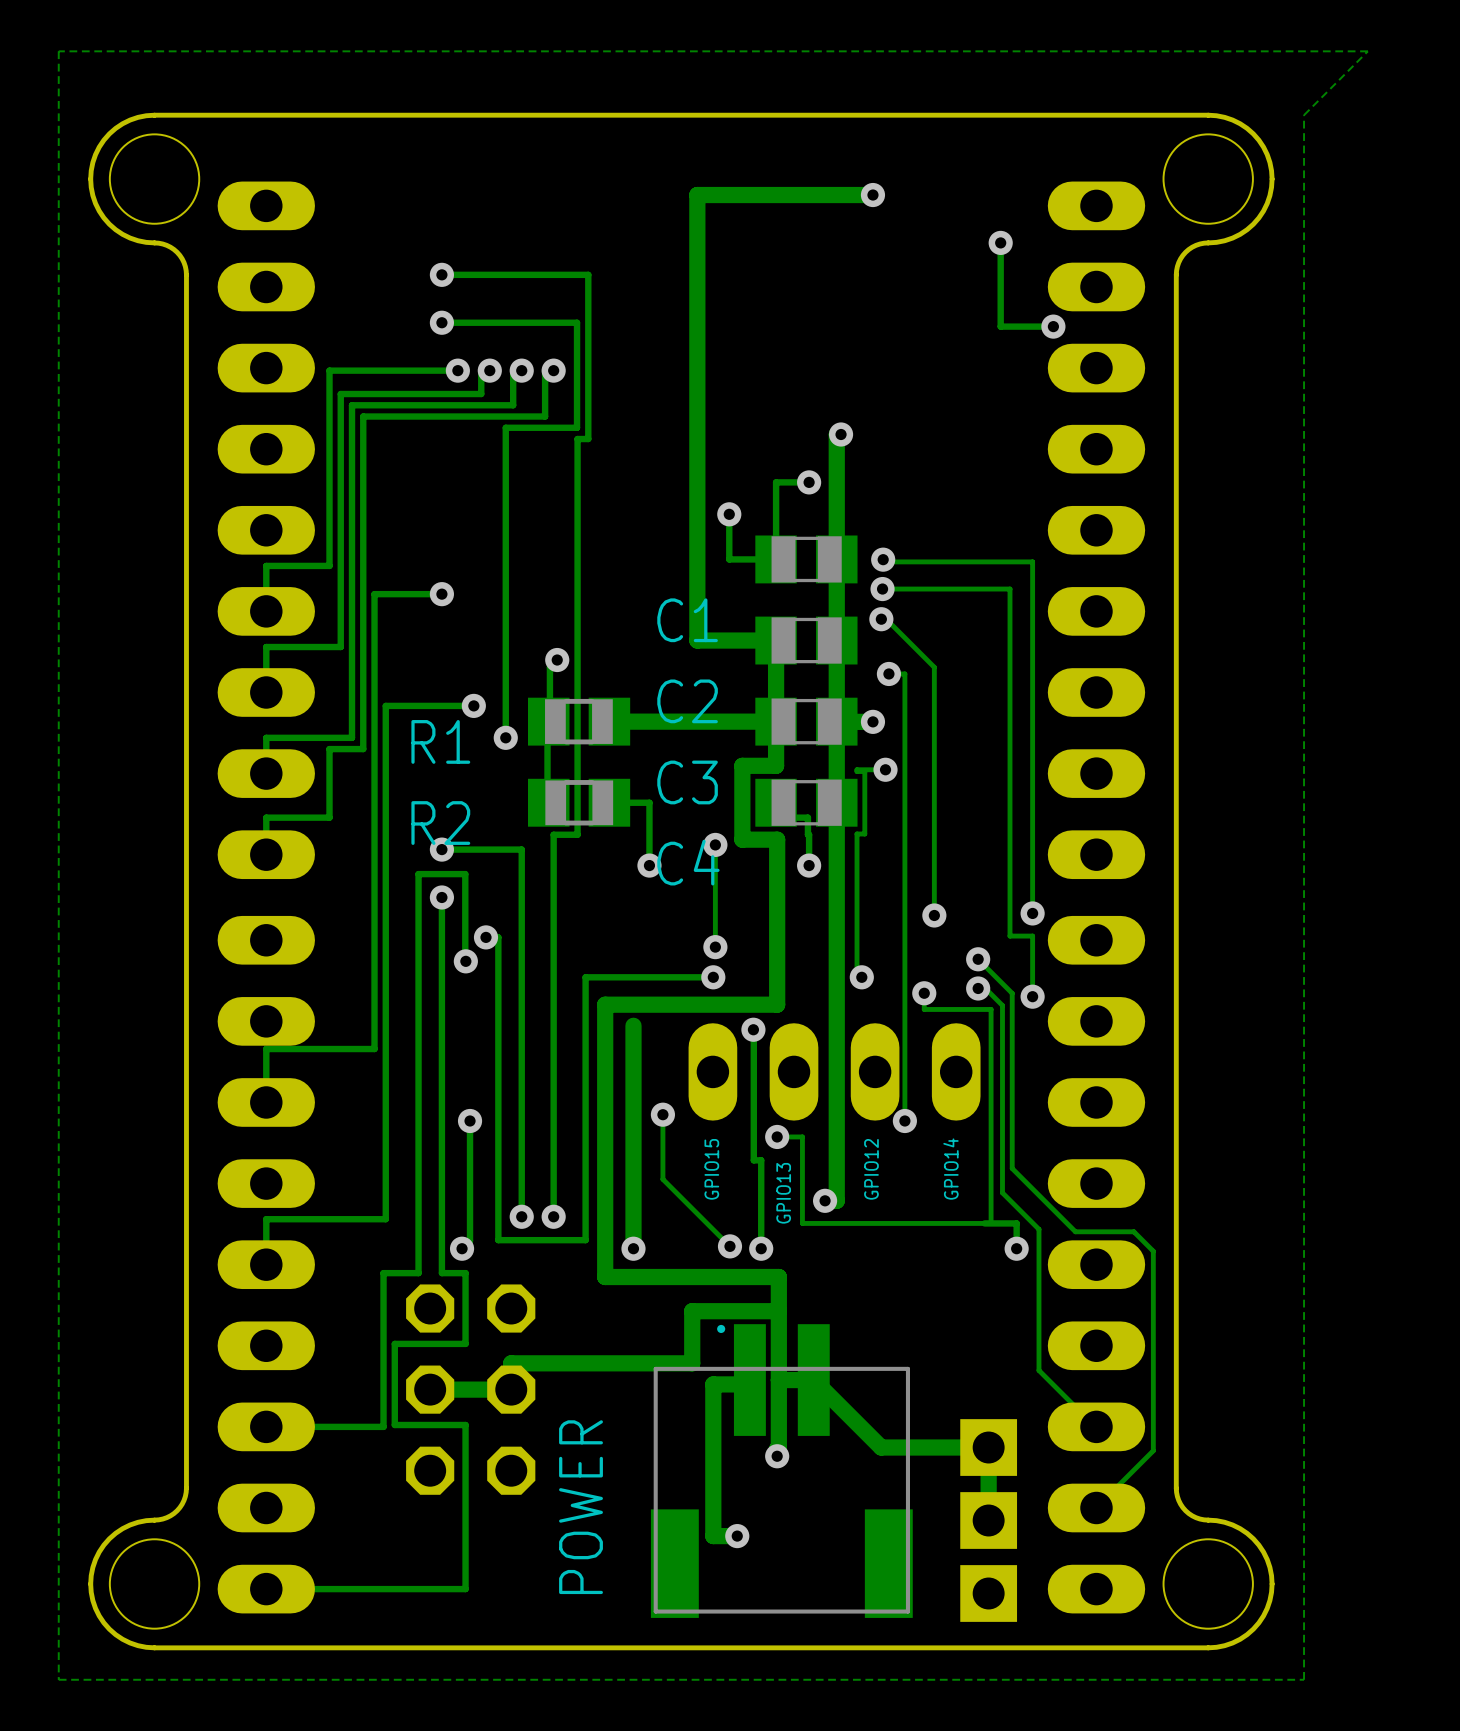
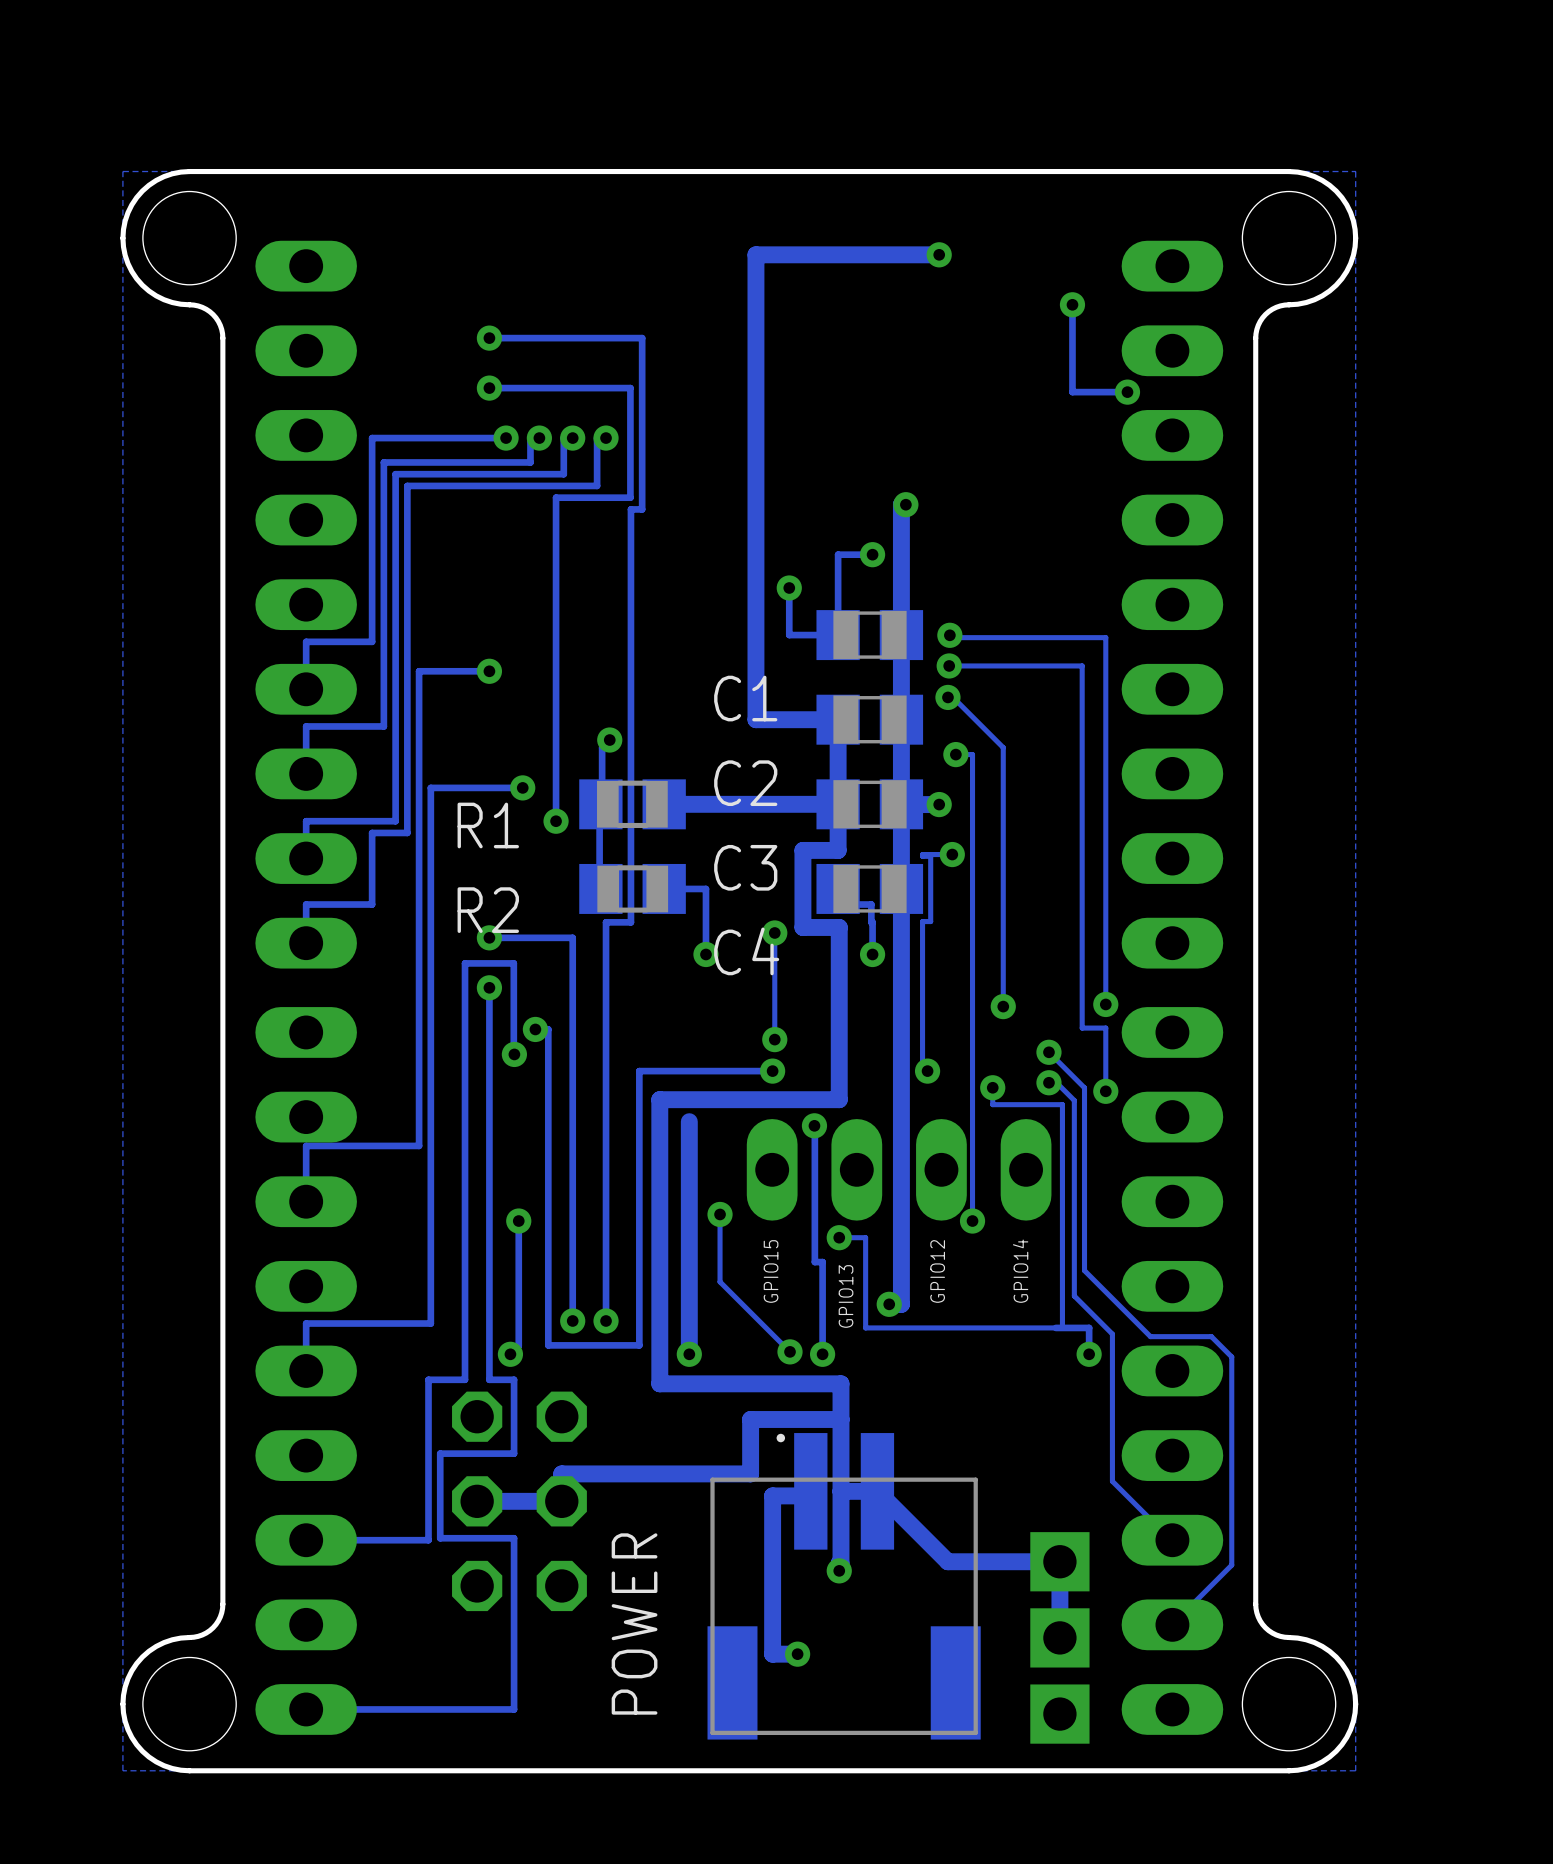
zone outline: (1367, 51) (58, 51) (58, 1679) (1304, 1679) (1304, 115) (1367, 51) -> (1355, 171) (1355, 1770) (122, 1770) (122, 171) (1355, 171)

